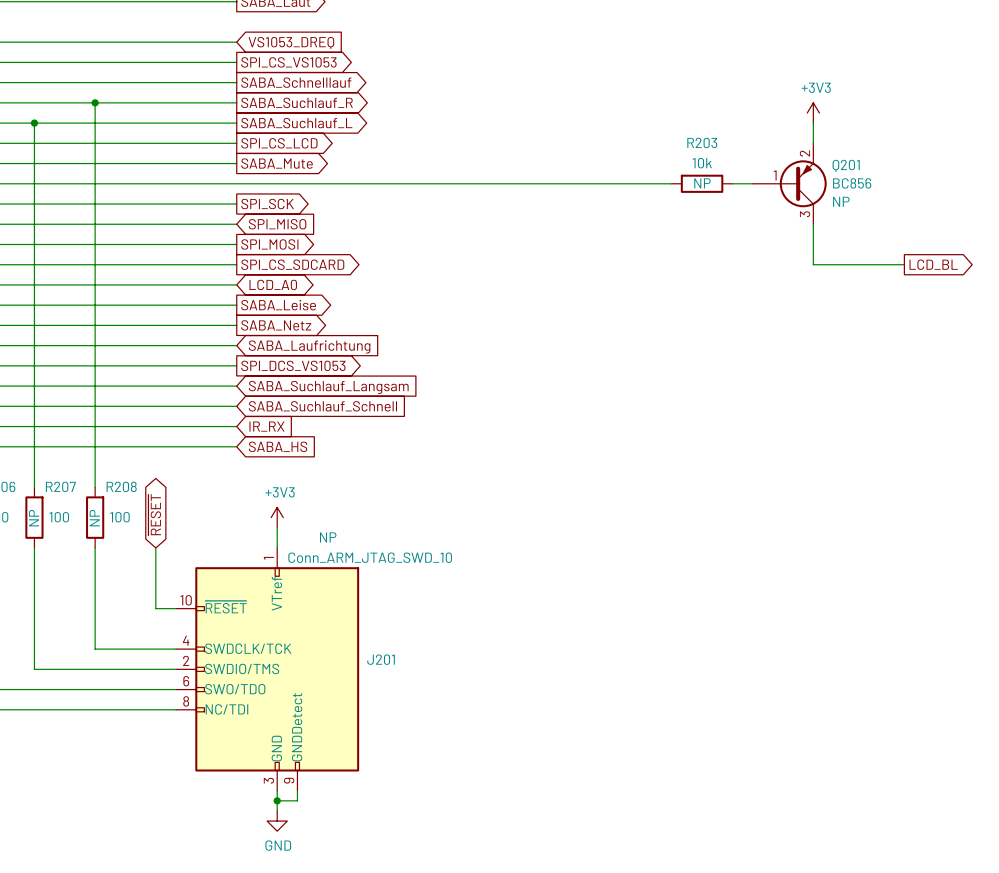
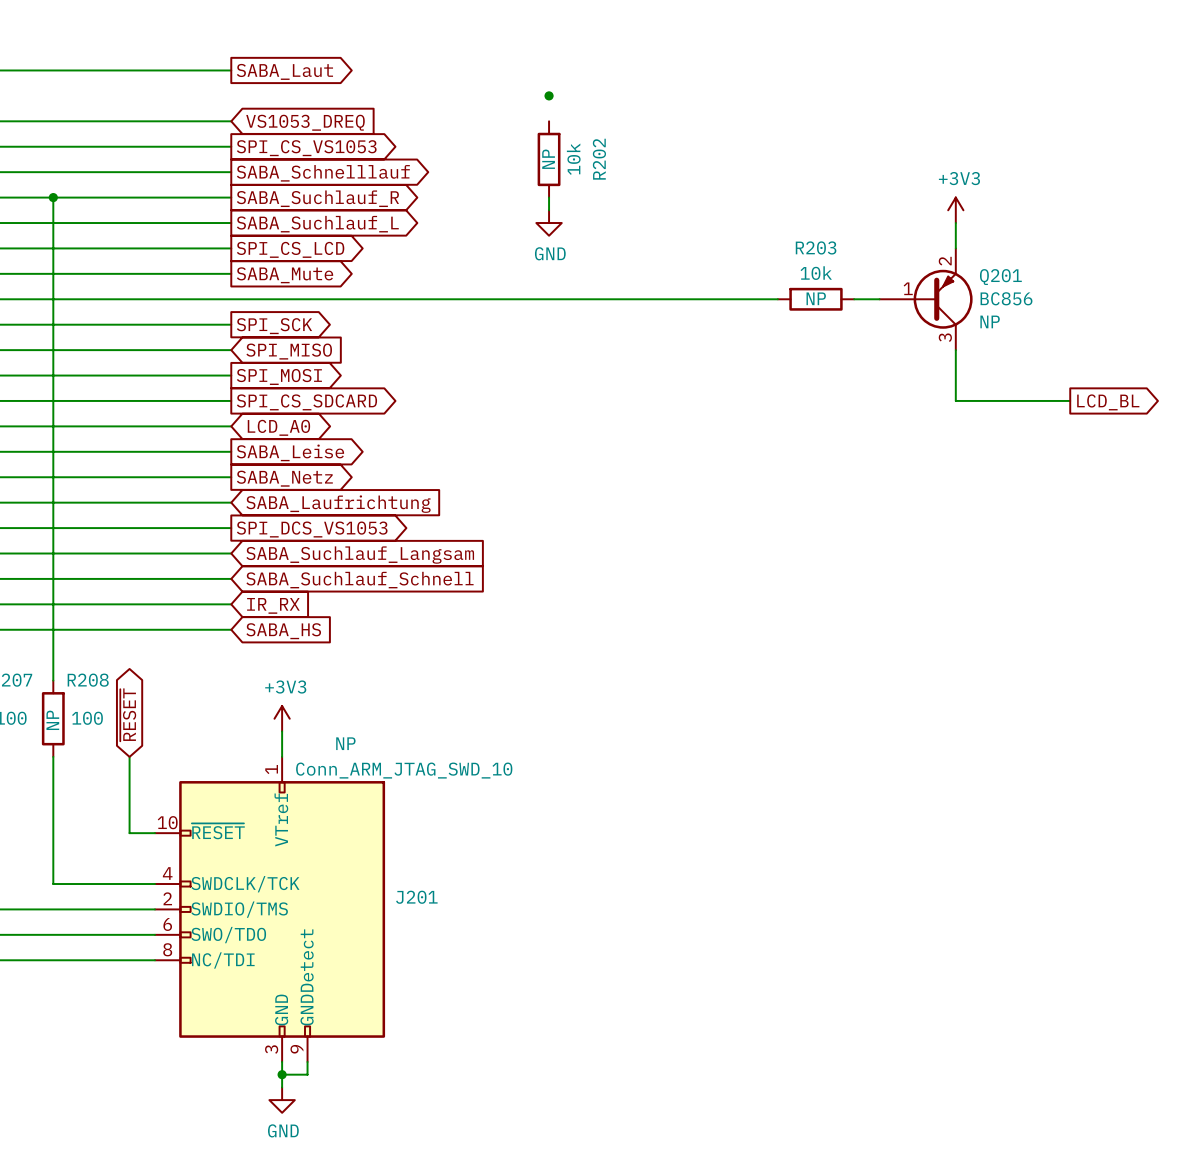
junction: none -> (549, 95)
R202: none -> 10k (549, 159)
wire: none -> (549, 197) (549, 210)
power symbol: none -> GND (549, 223)

